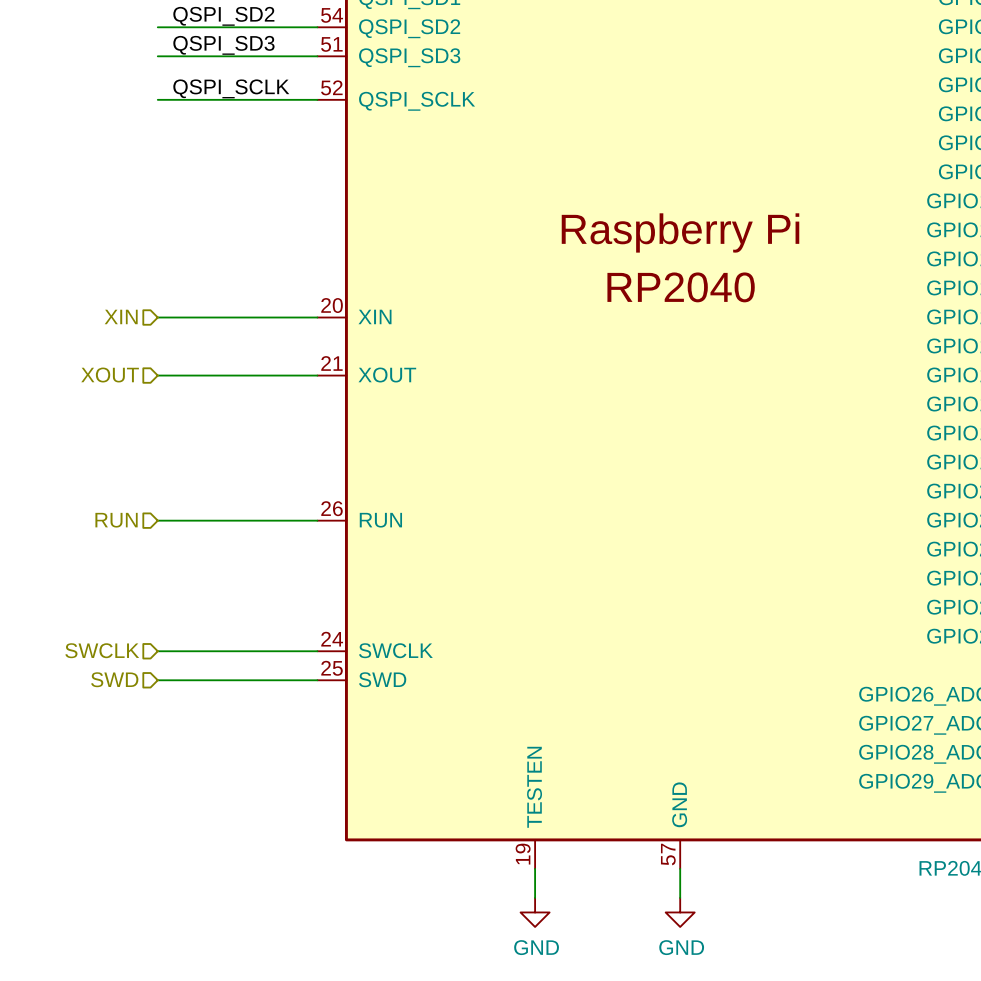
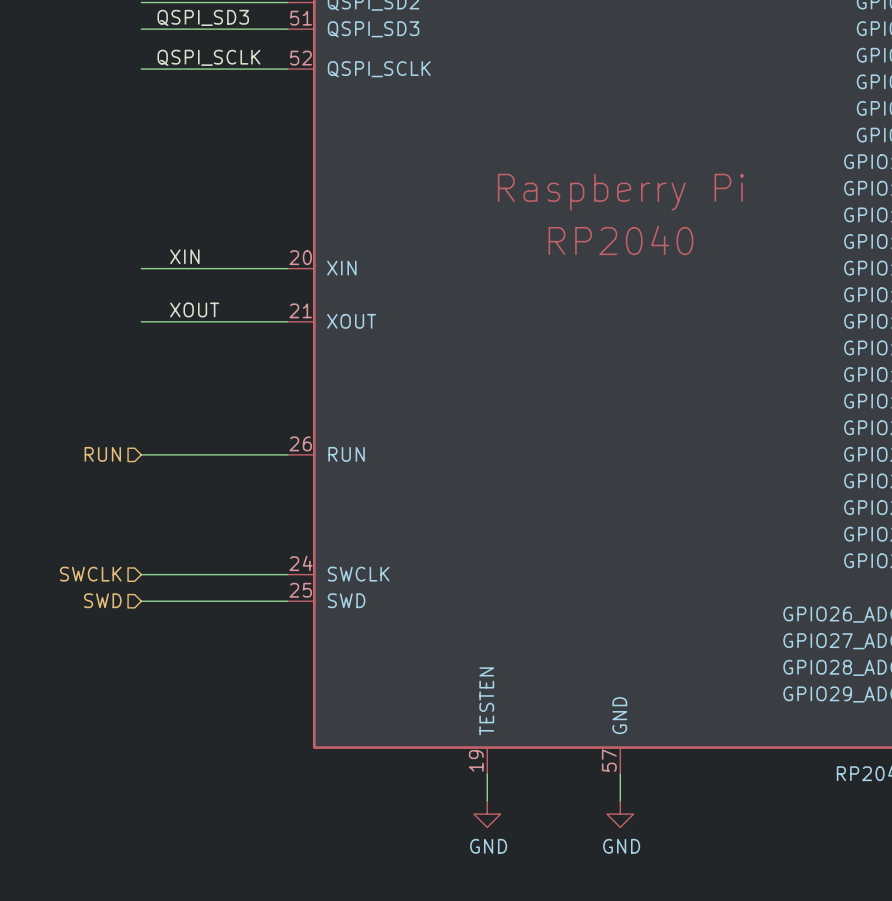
label: none -> XIN (184, 256)
hierarchical label: XIN (121, 316) -> none
label: none -> XOUT (194, 309)
hierarchical label: XOUT (110, 375) -> none

